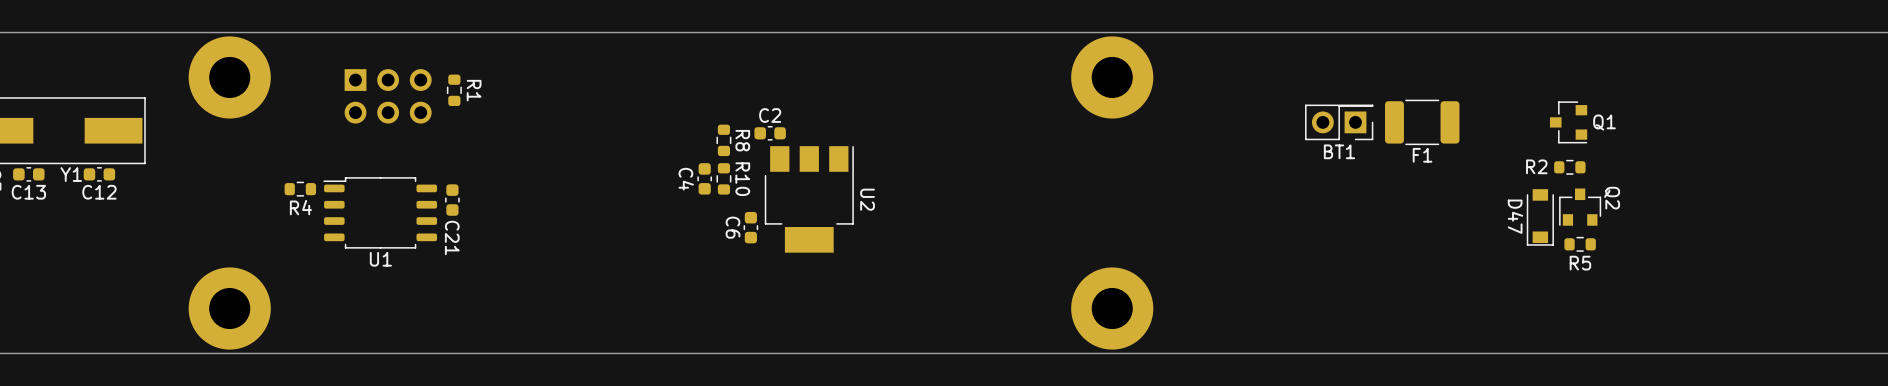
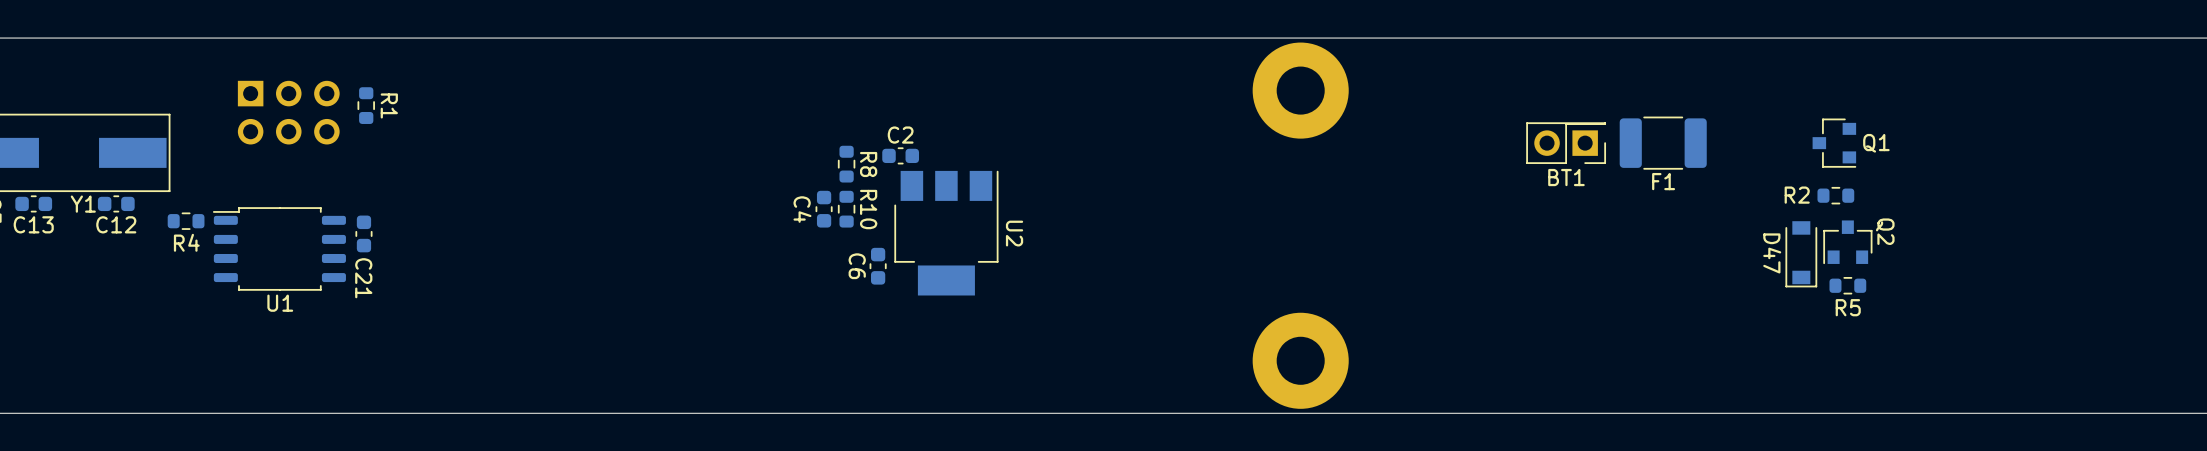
part: (229, 77) -> none
R1 position: (454, 90) -> (366, 105)
part position: (388, 96) -> (288, 112)
R4 position: (300, 189) -> (186, 221)
C21 position: (452, 200) -> (363, 233)
U1 position: (380, 212) -> (279, 248)
part: (229, 308) -> none

